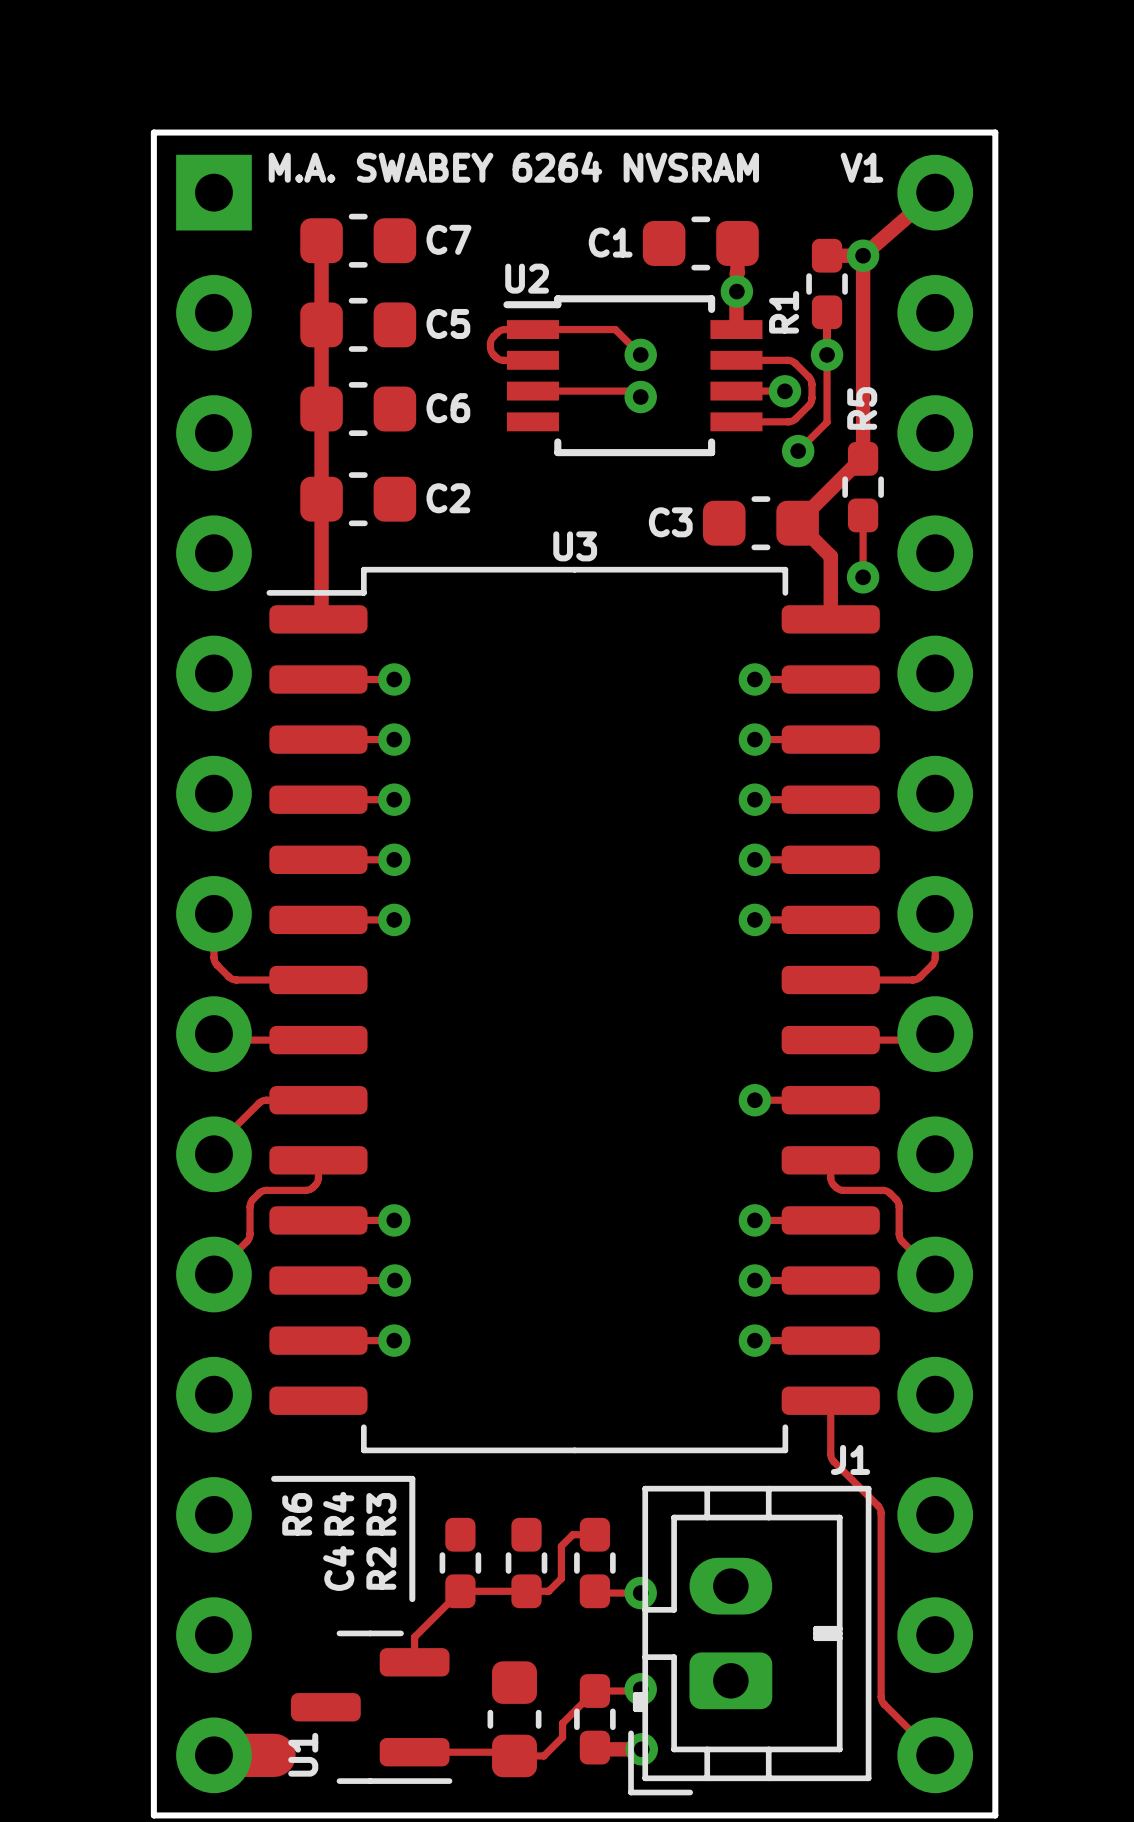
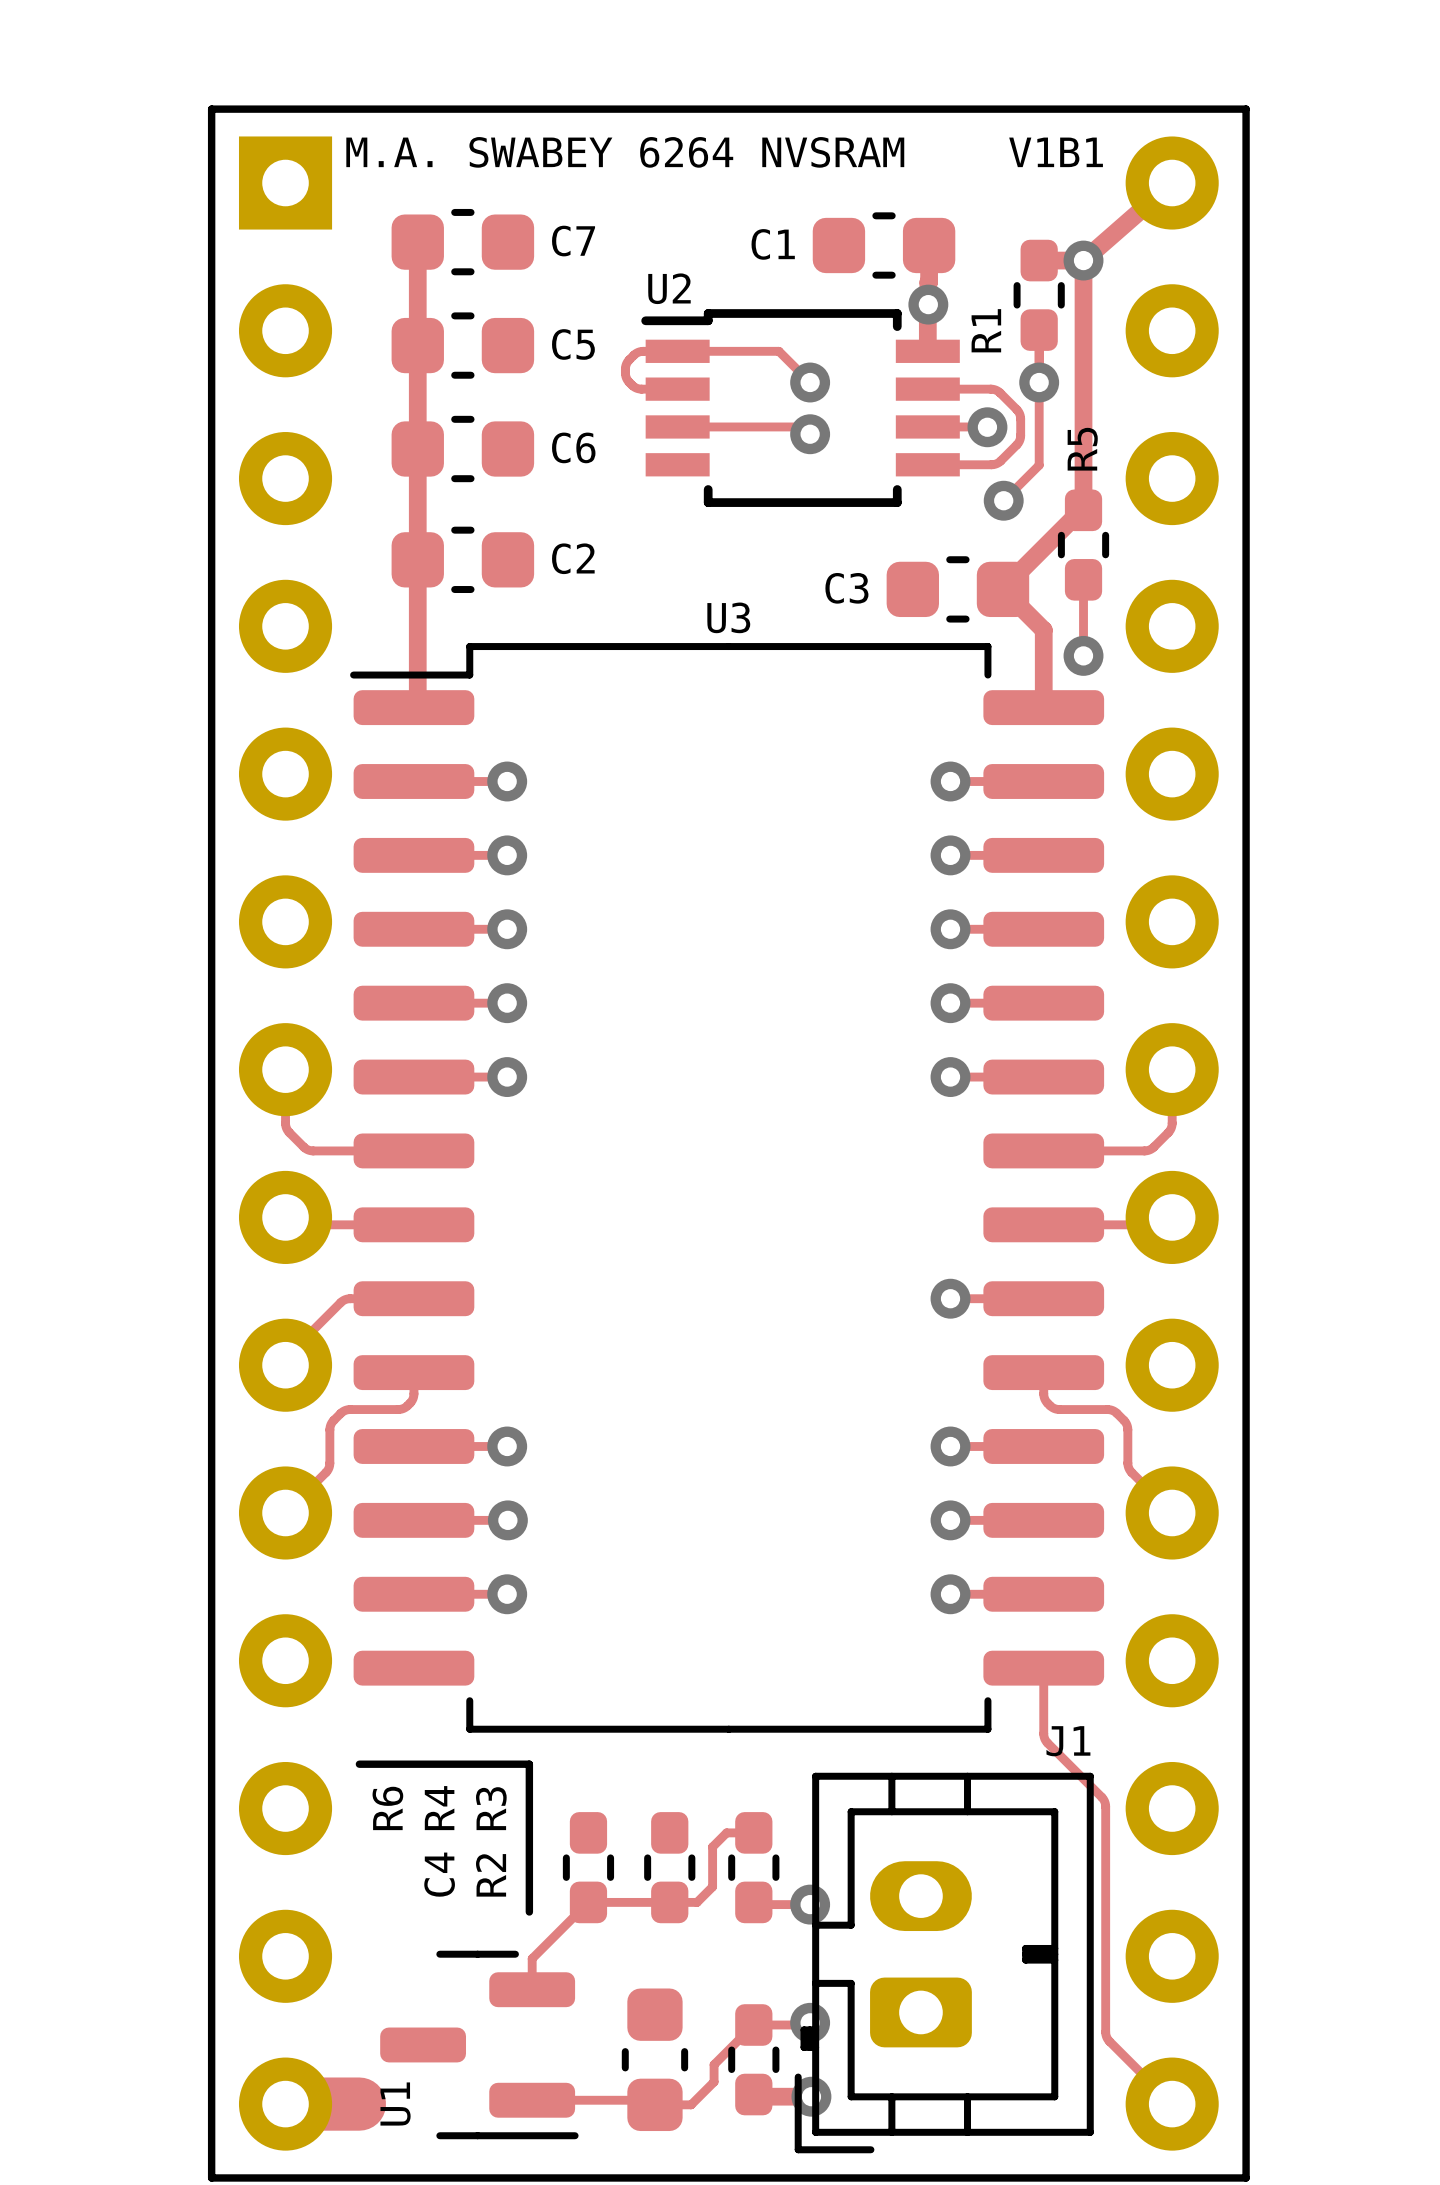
text: V1 (861, 167) -> V1B1 (1056, 152)

